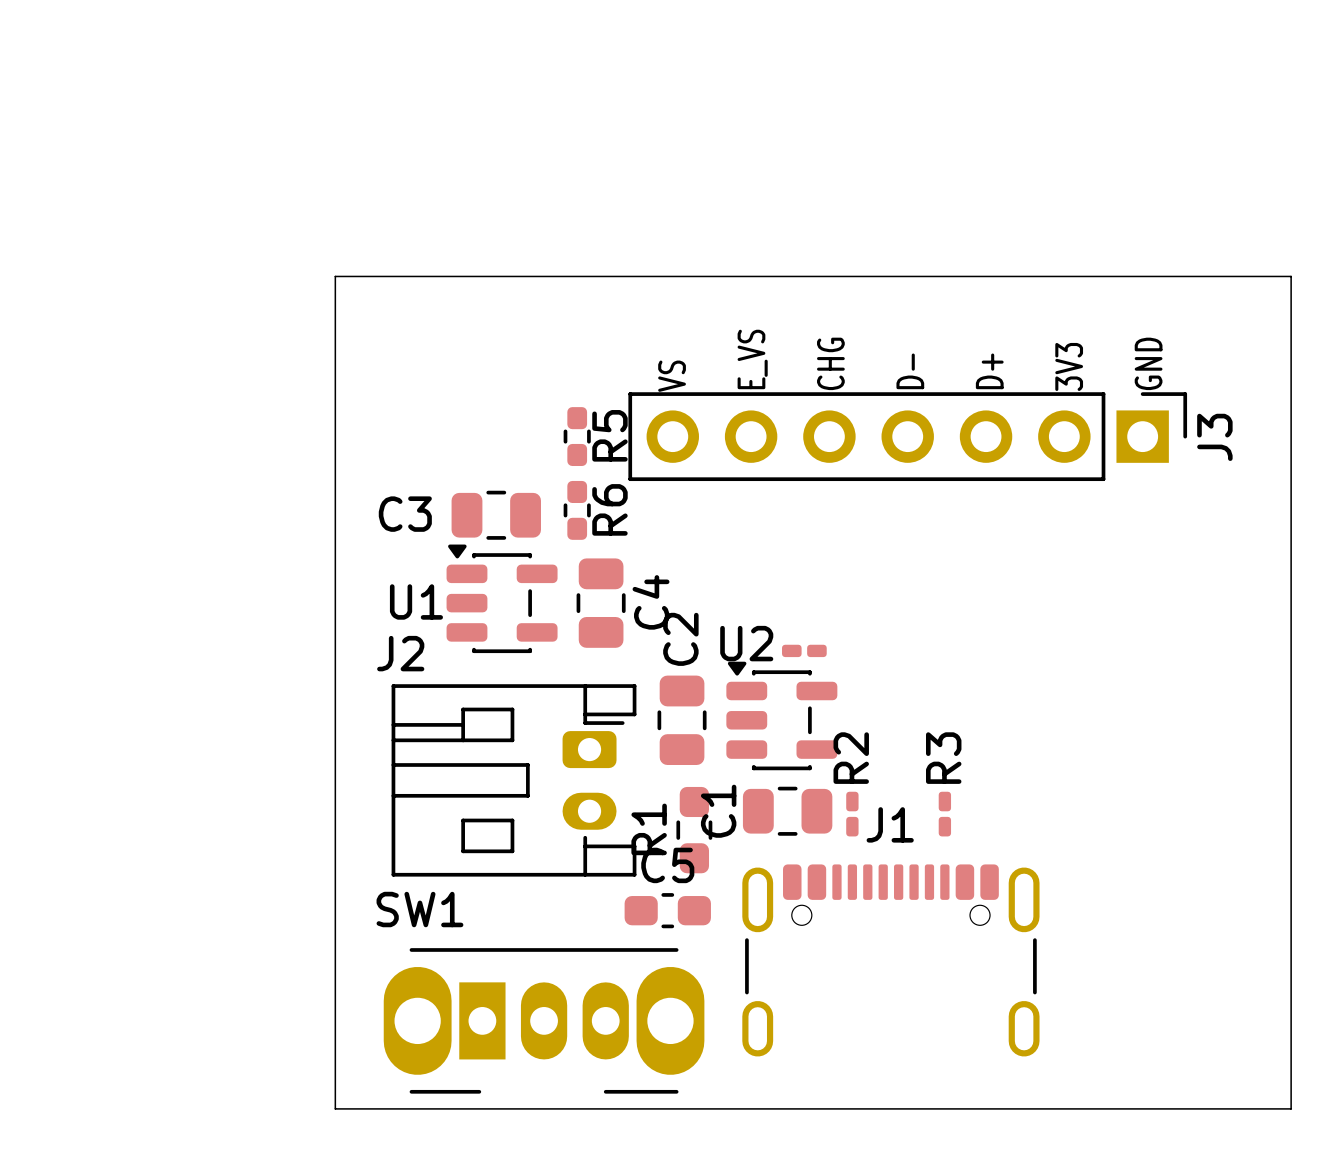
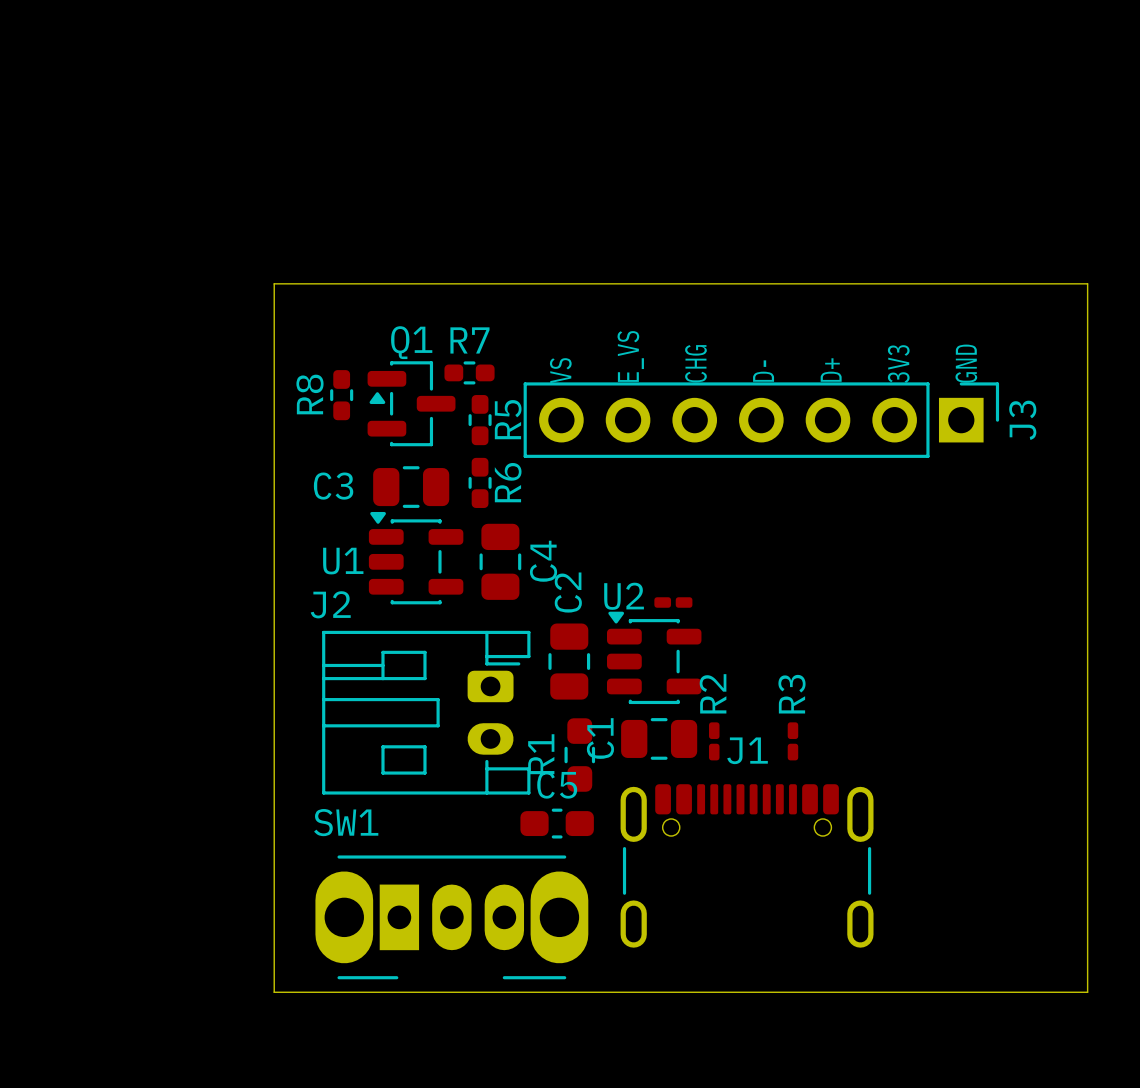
R7: none -> (469, 372)
R8: none -> (341, 395)
Q1: none -> (411, 403)

